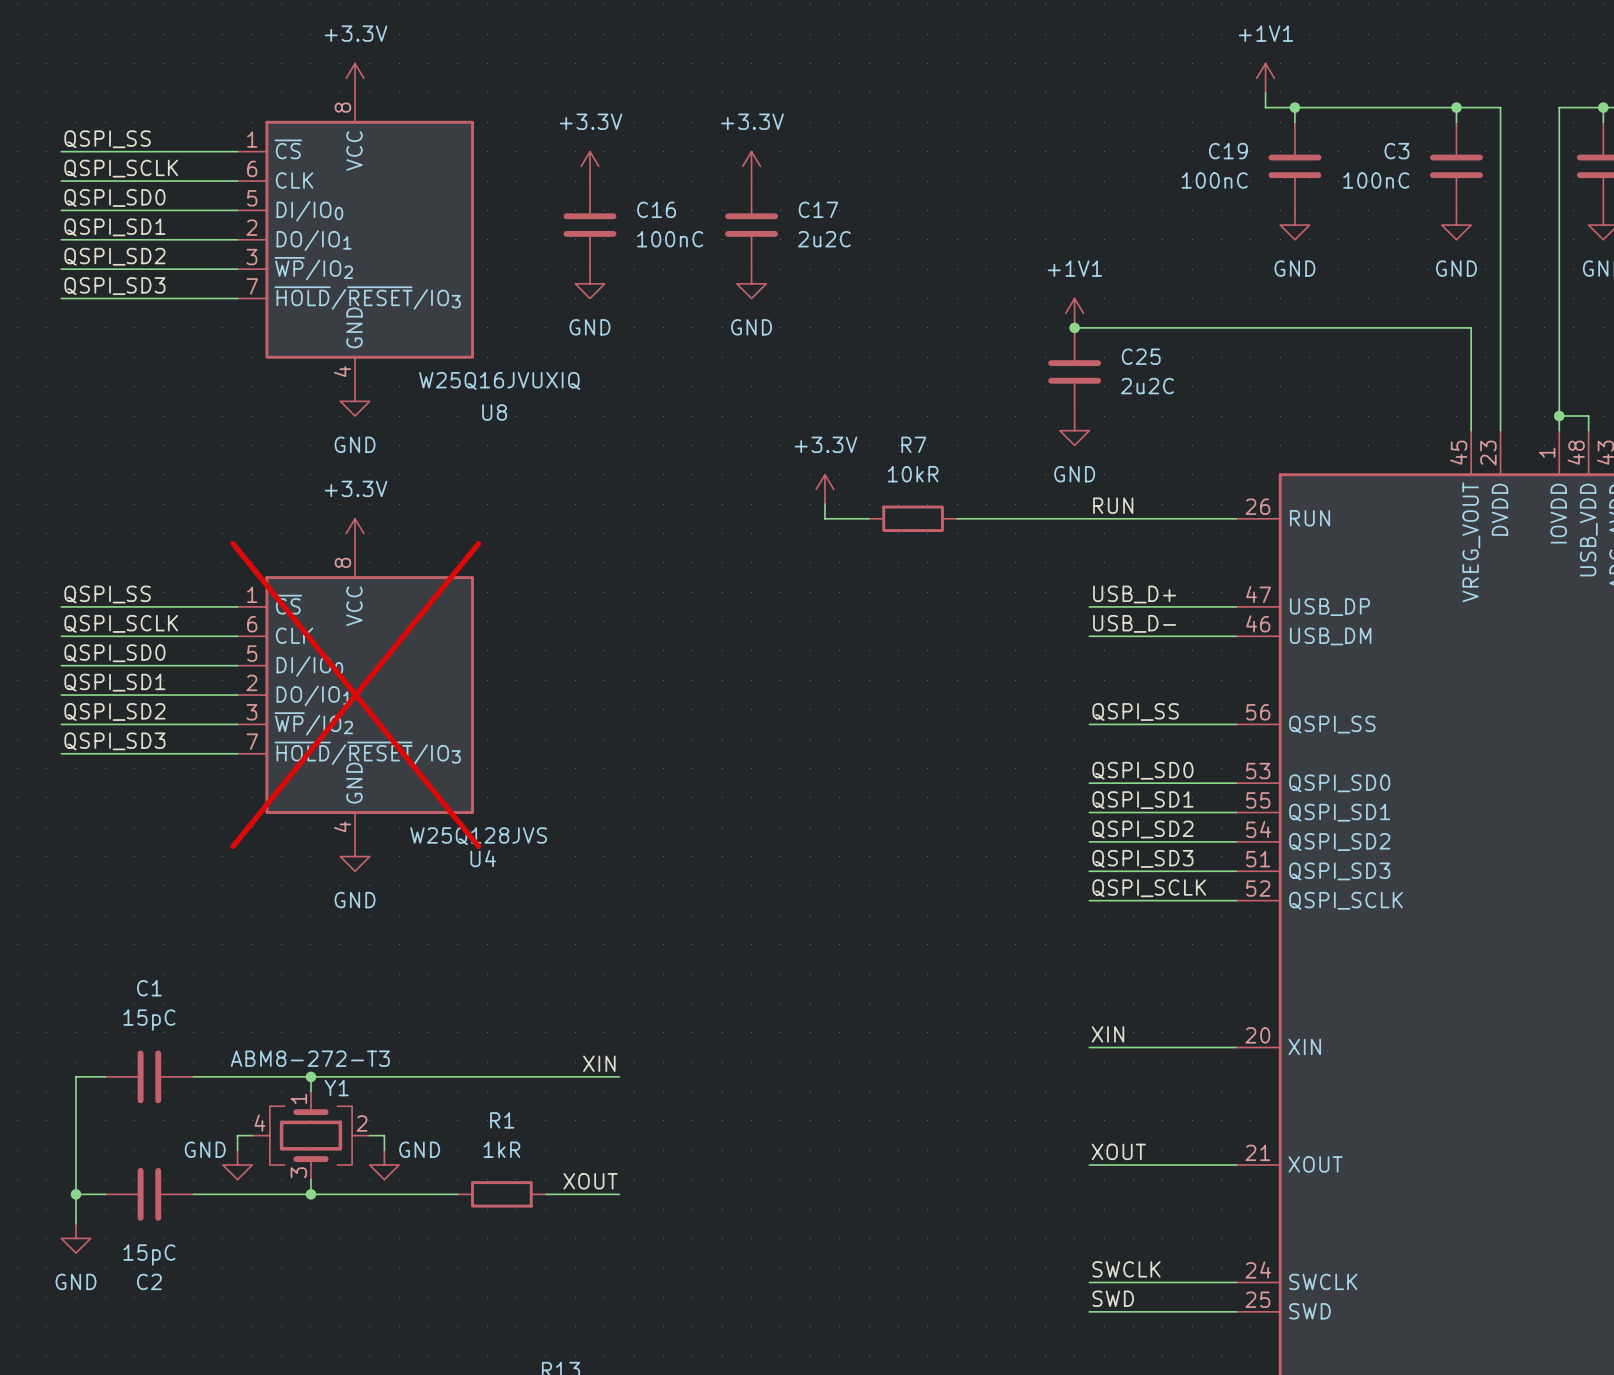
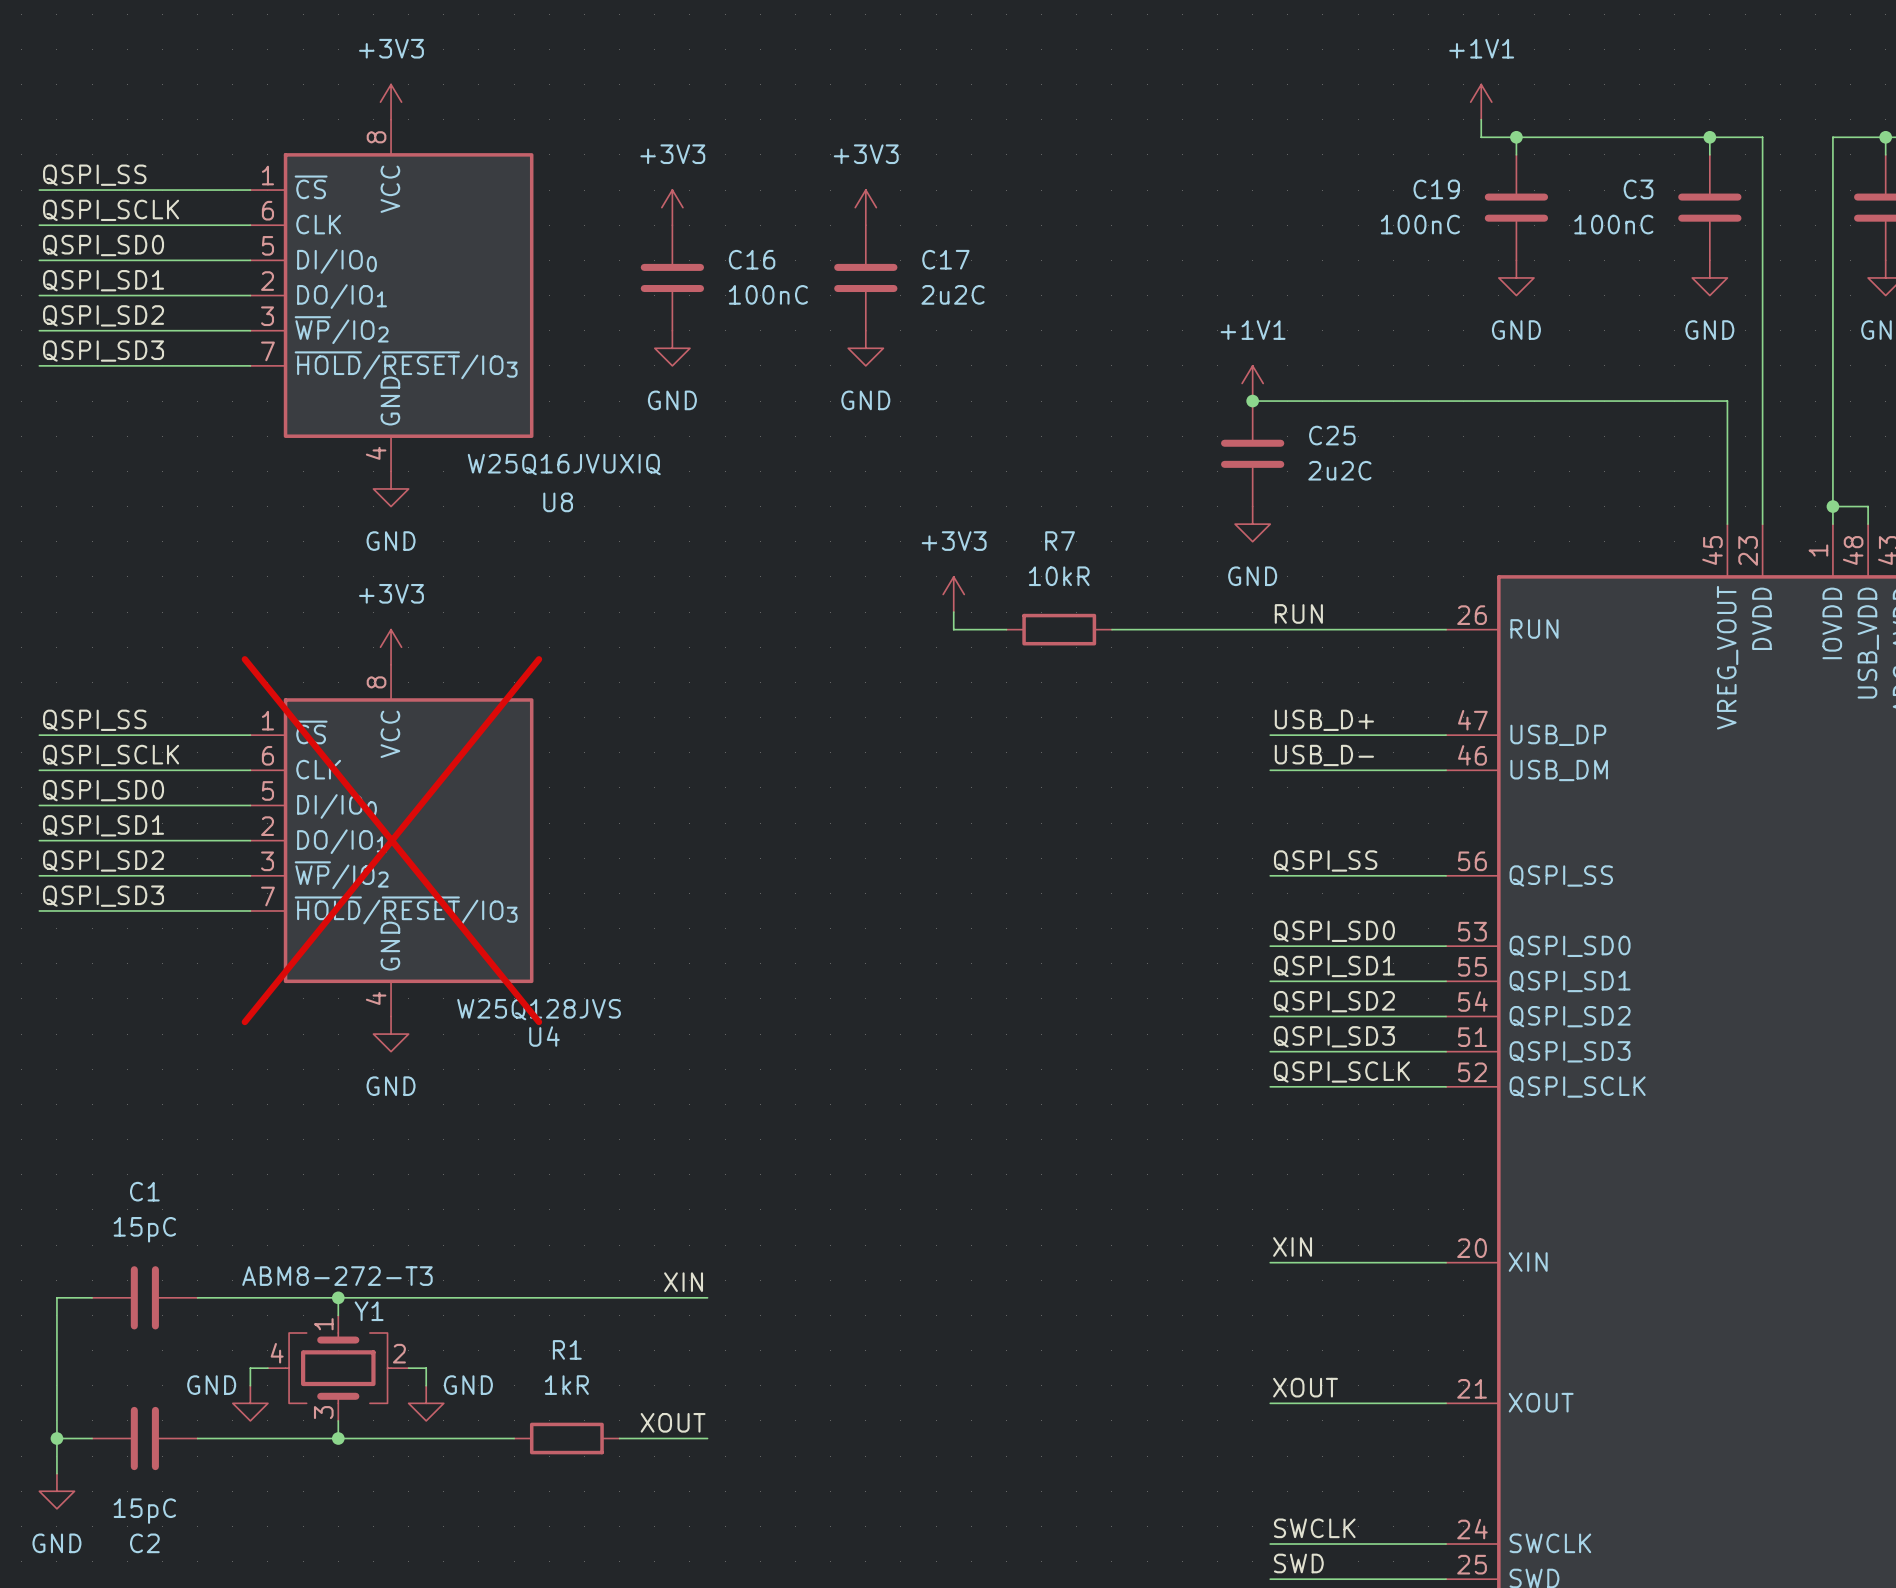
power symbol: +3.3V (355, 78) -> +3V3 (391, 102)
power symbol: +3.3V (590, 166) -> +3V3 (672, 207)
power symbol: +3.3V (751, 166) -> +3V3 (865, 207)
power symbol: +3.3V (824, 489) -> +3V3 (953, 594)
power symbol: +3.3V (355, 533) -> +3V3 (391, 647)

